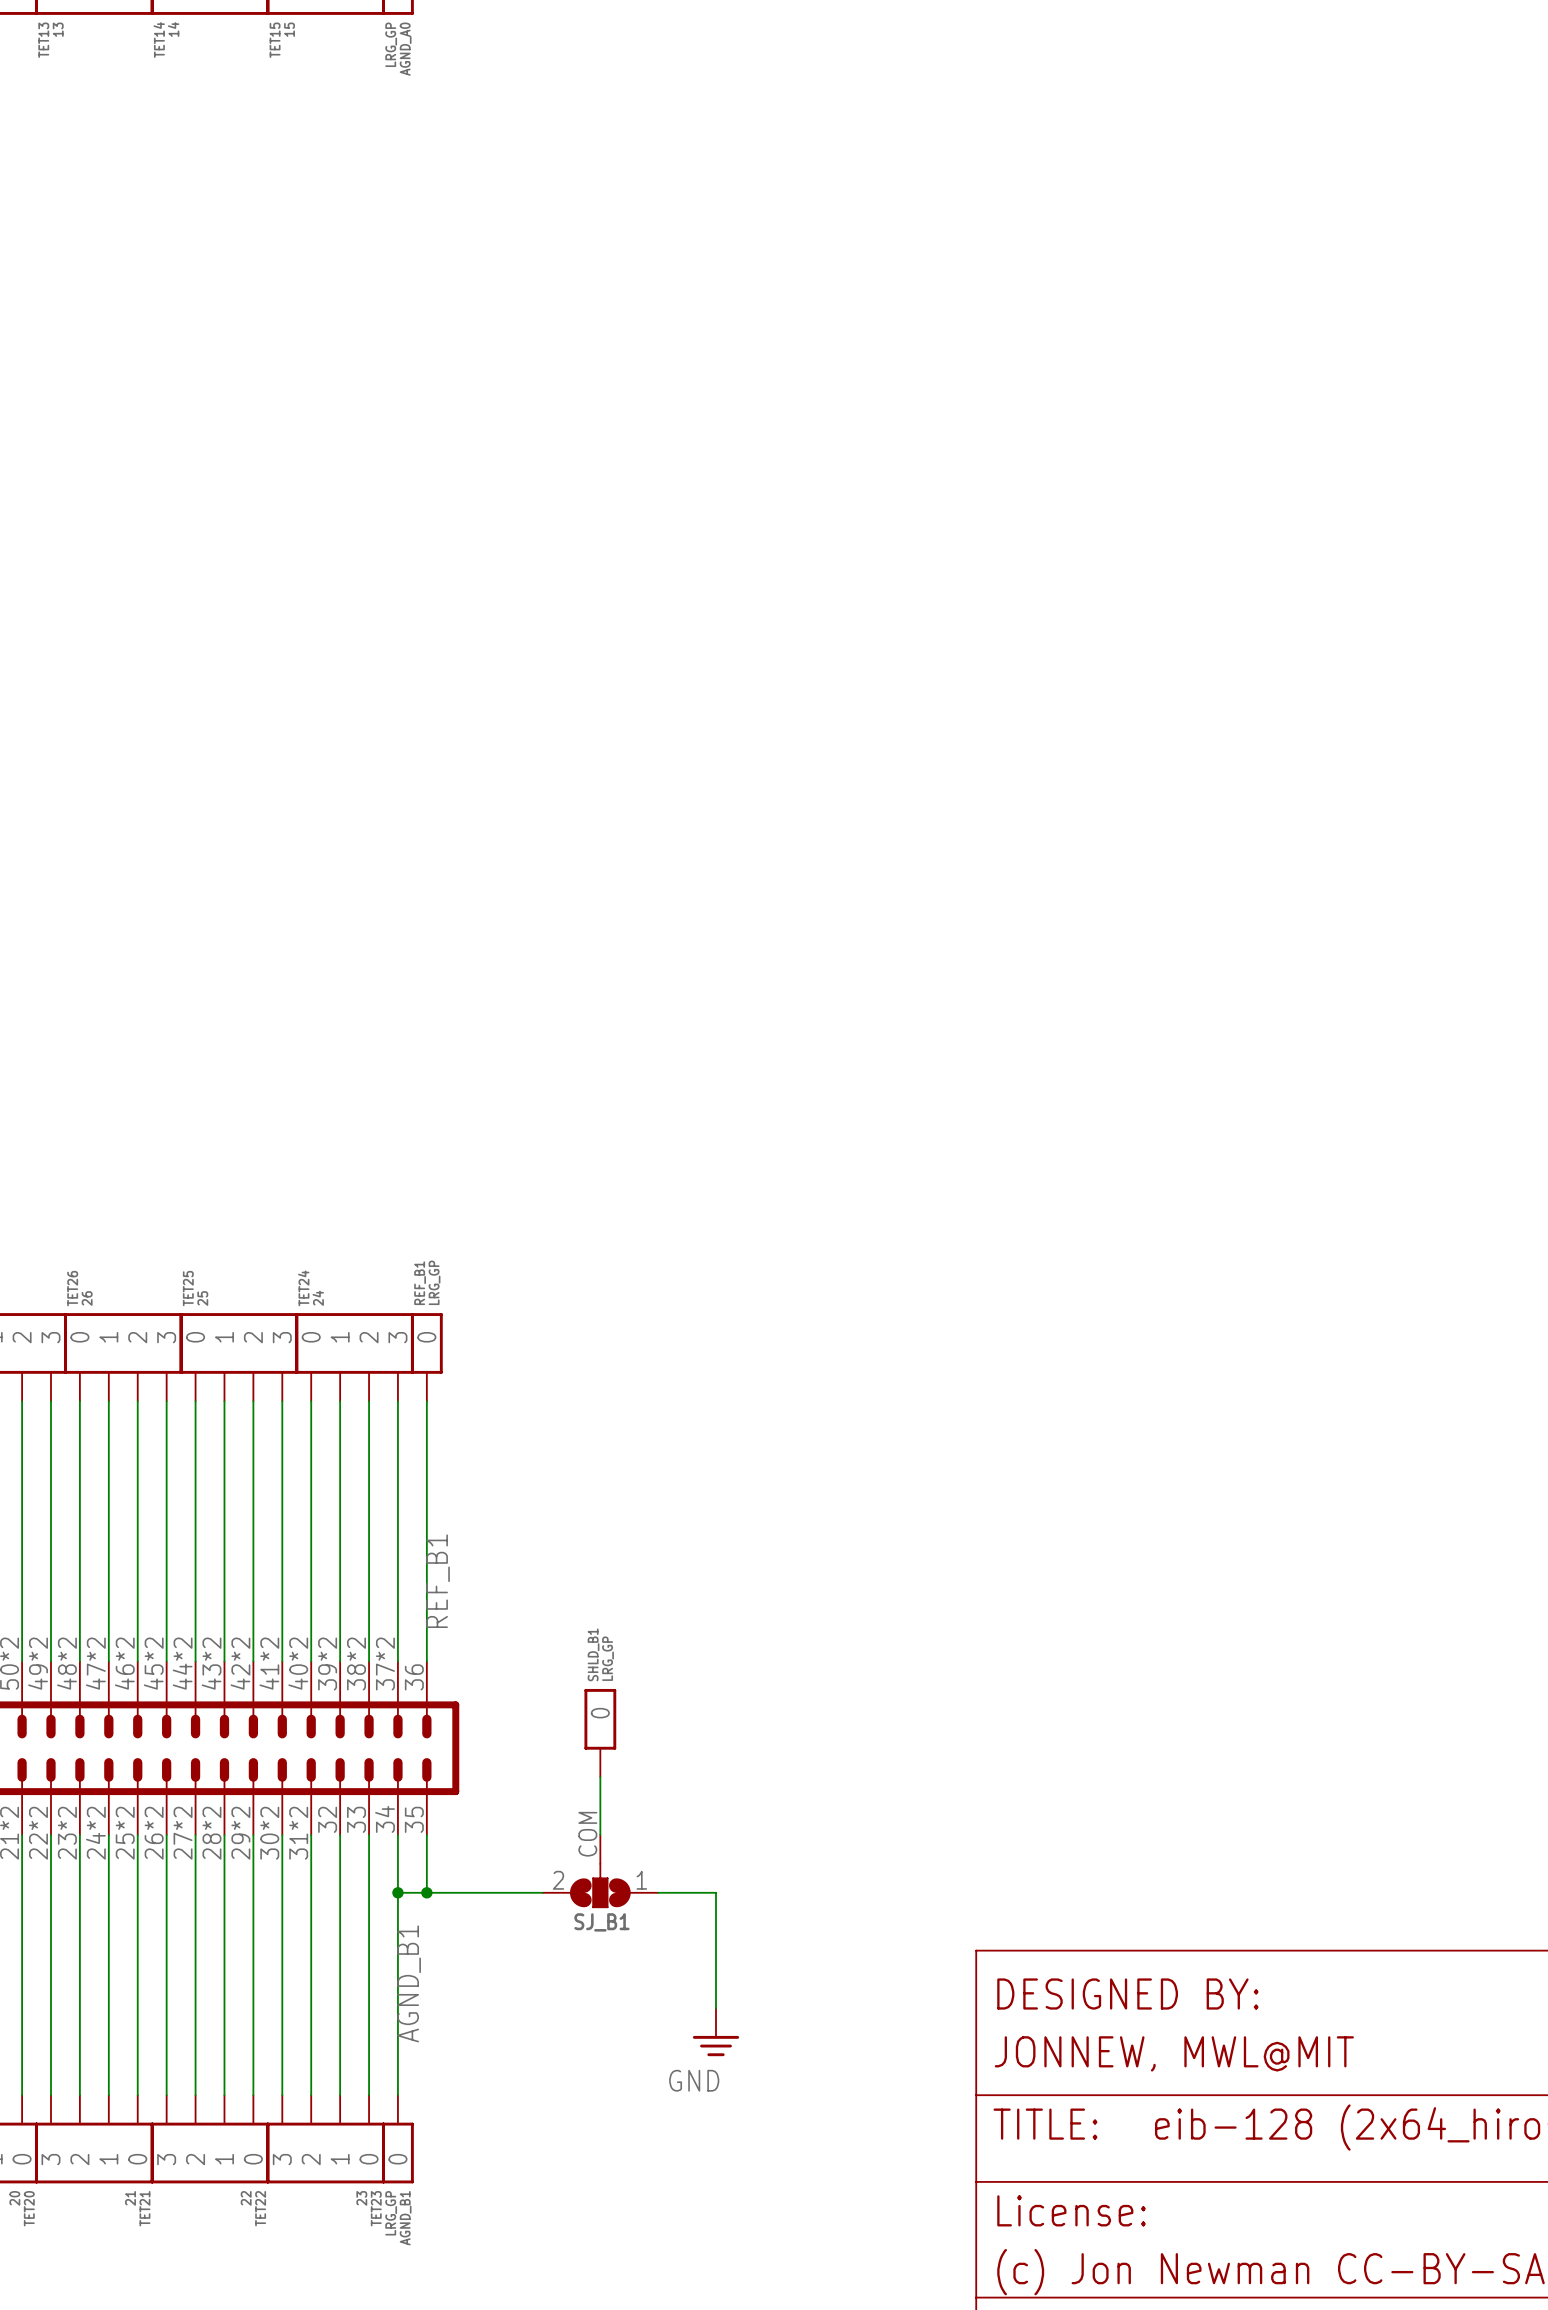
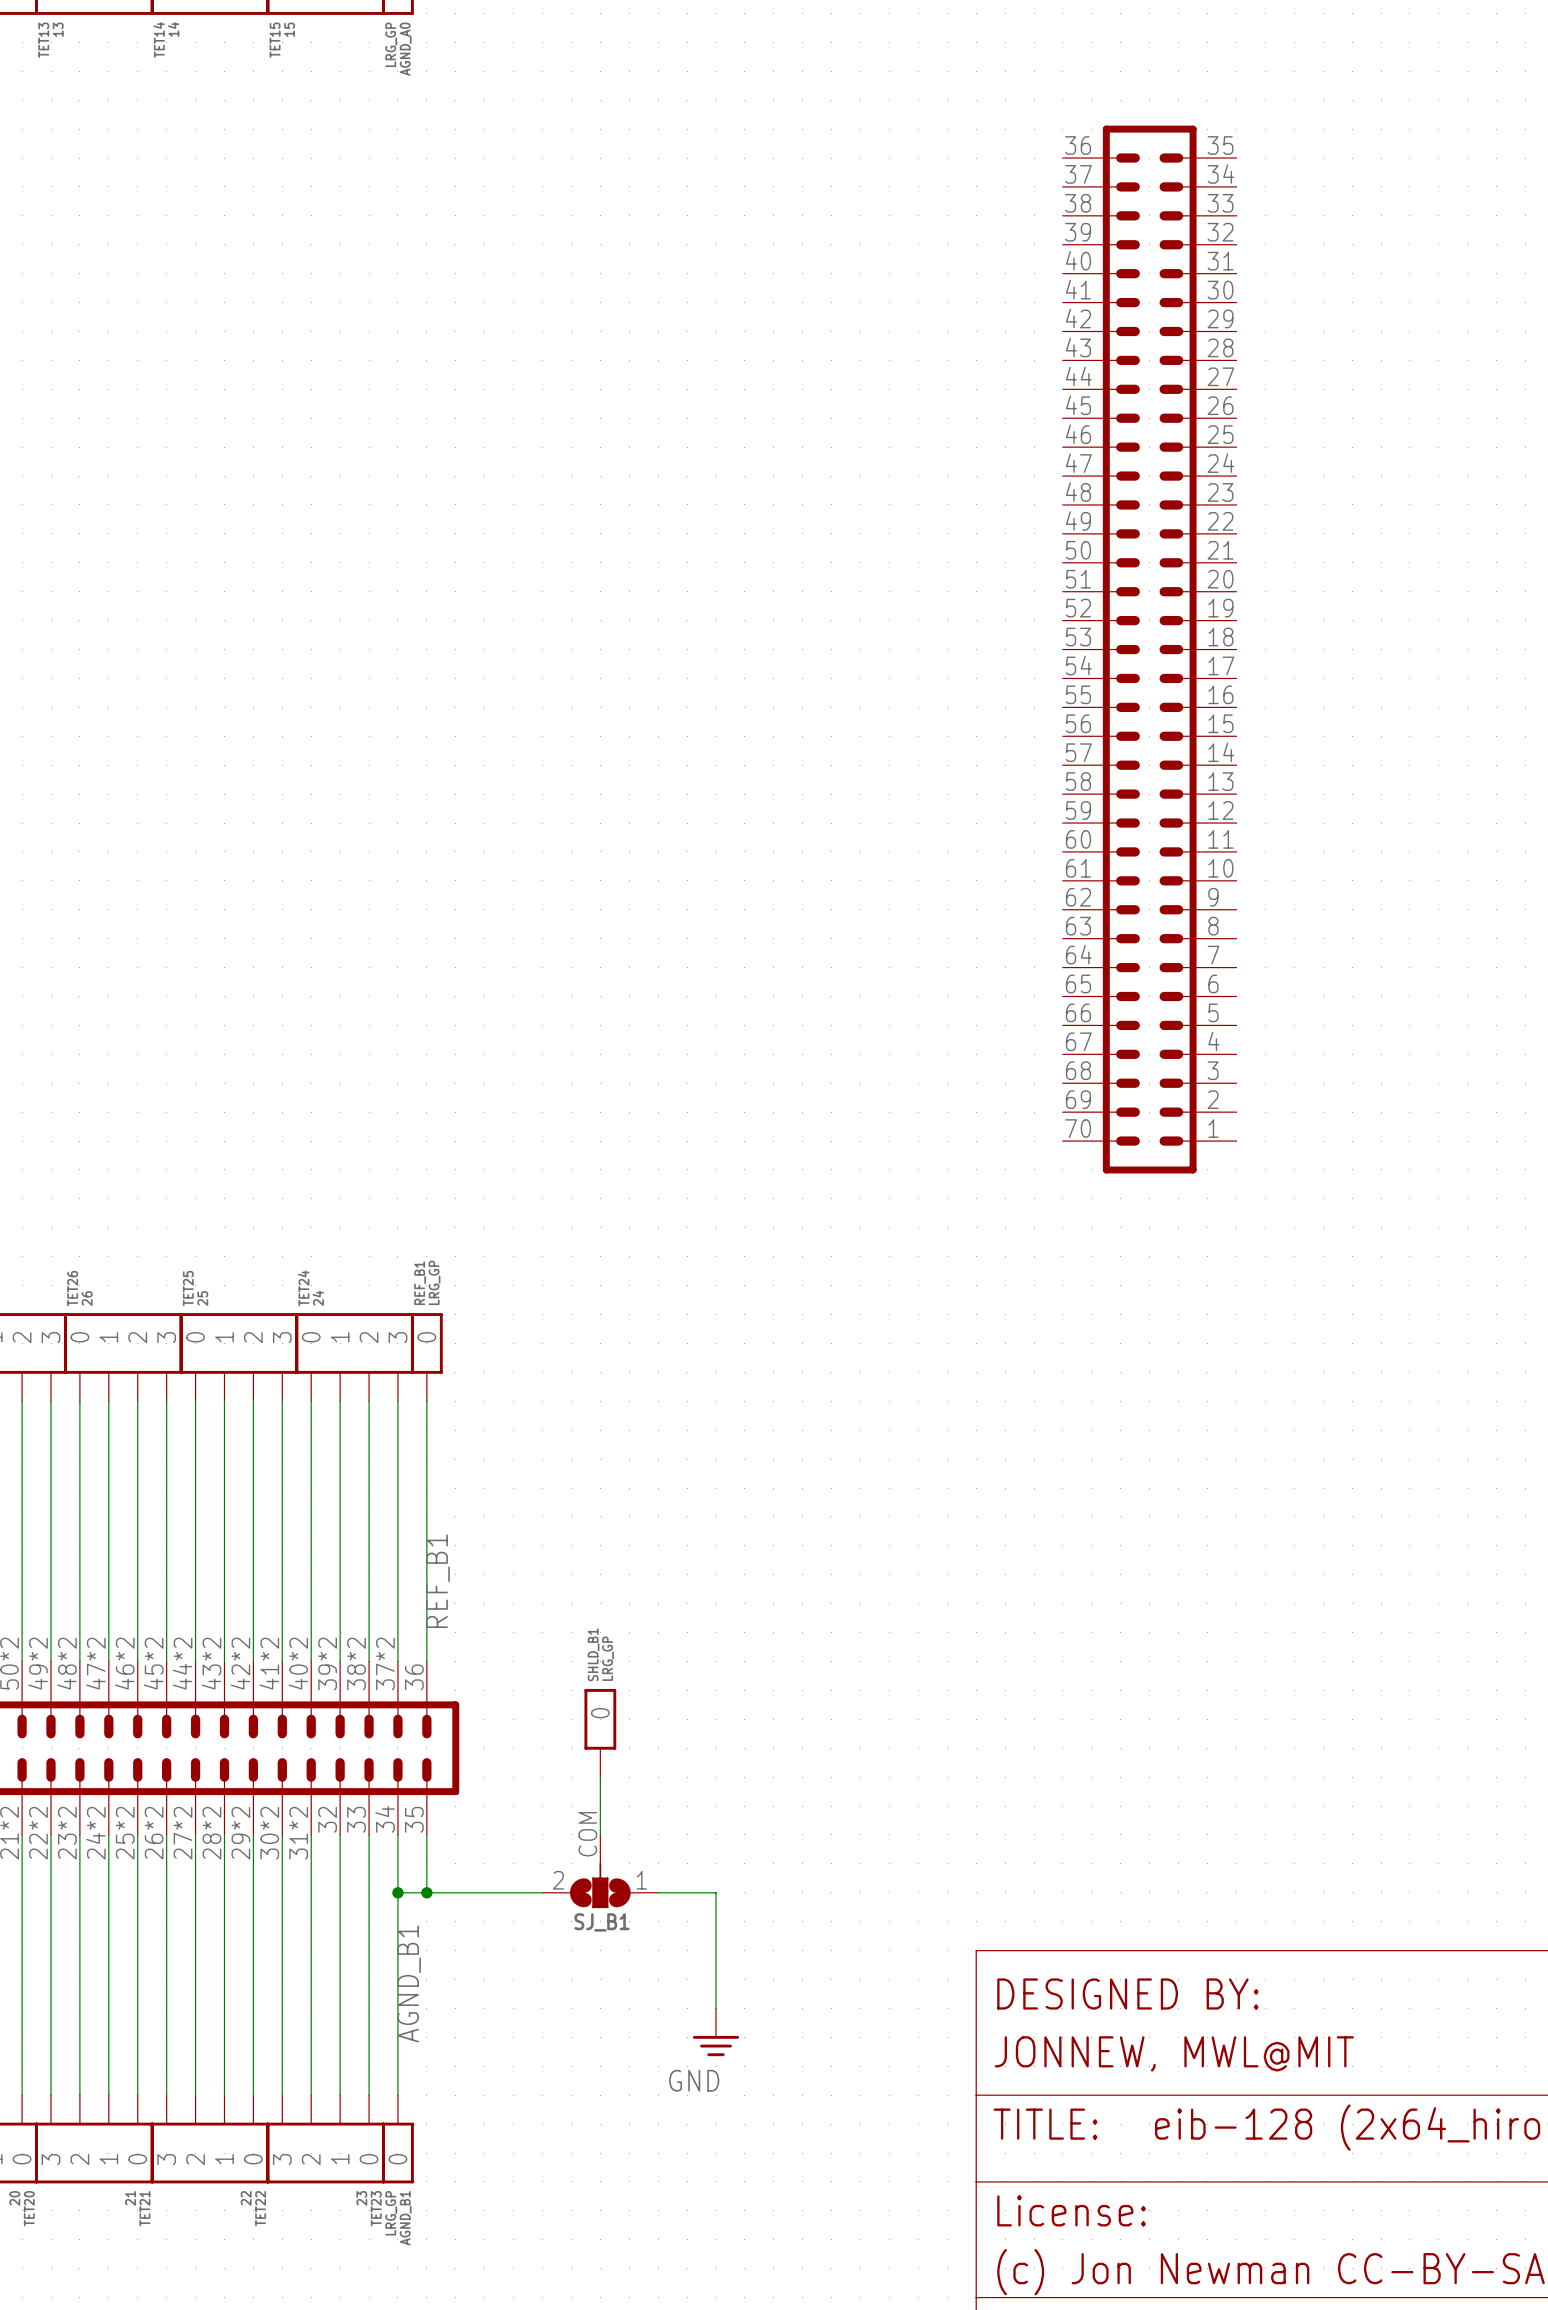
part: none -> (1149, 649)

